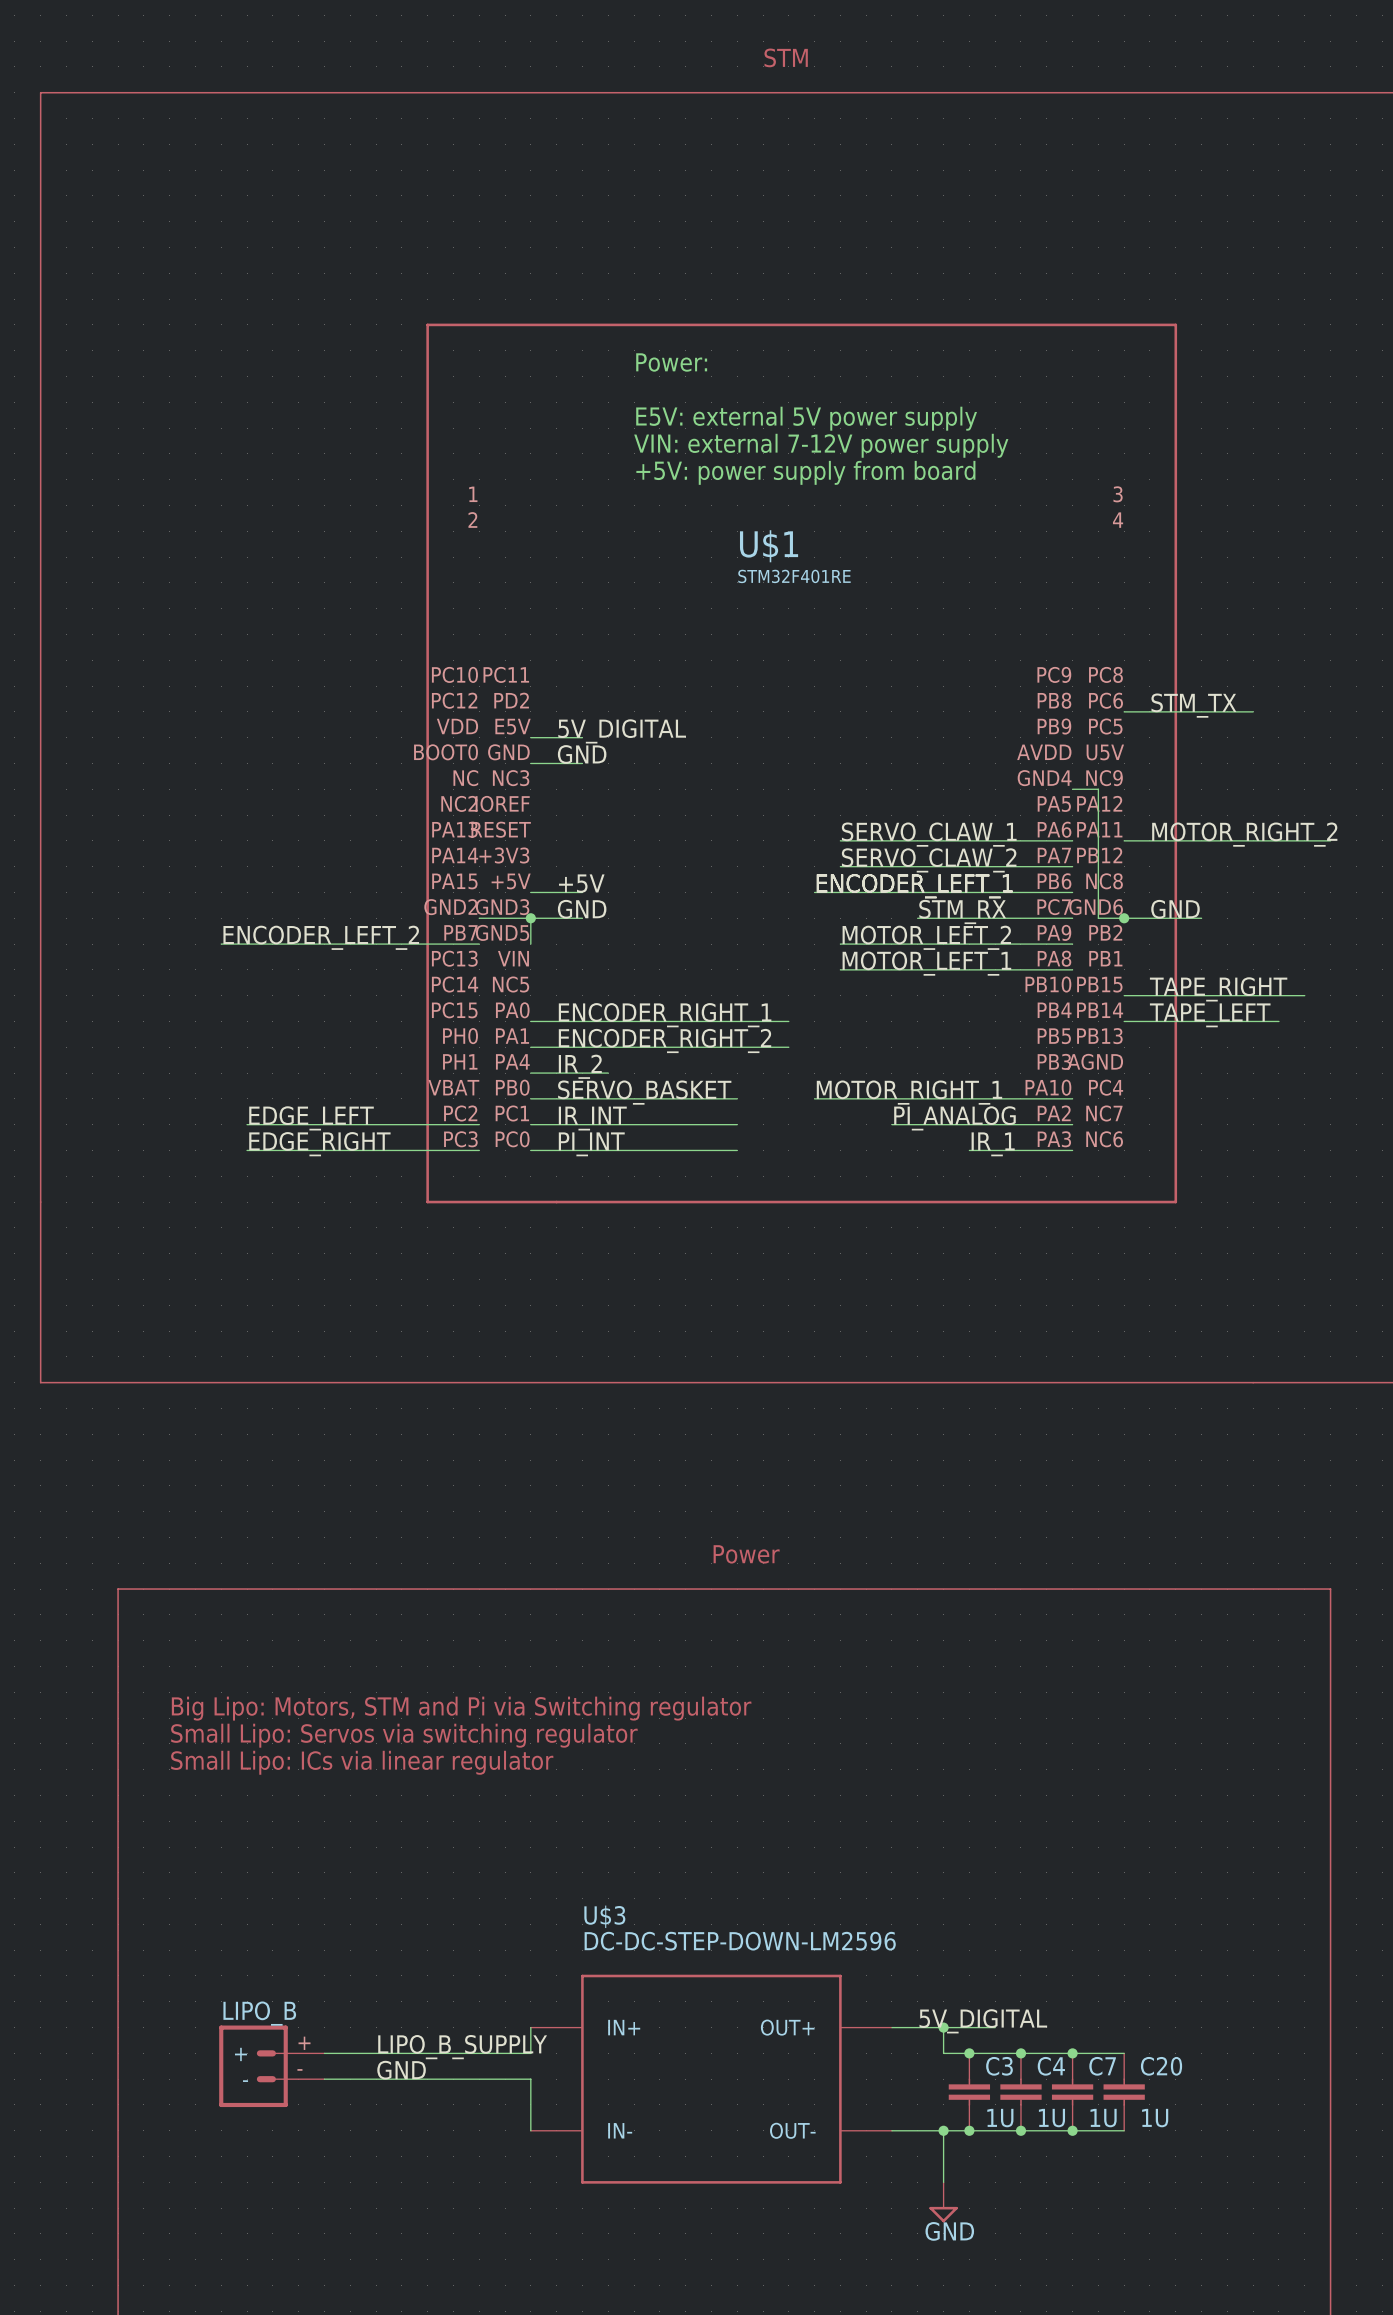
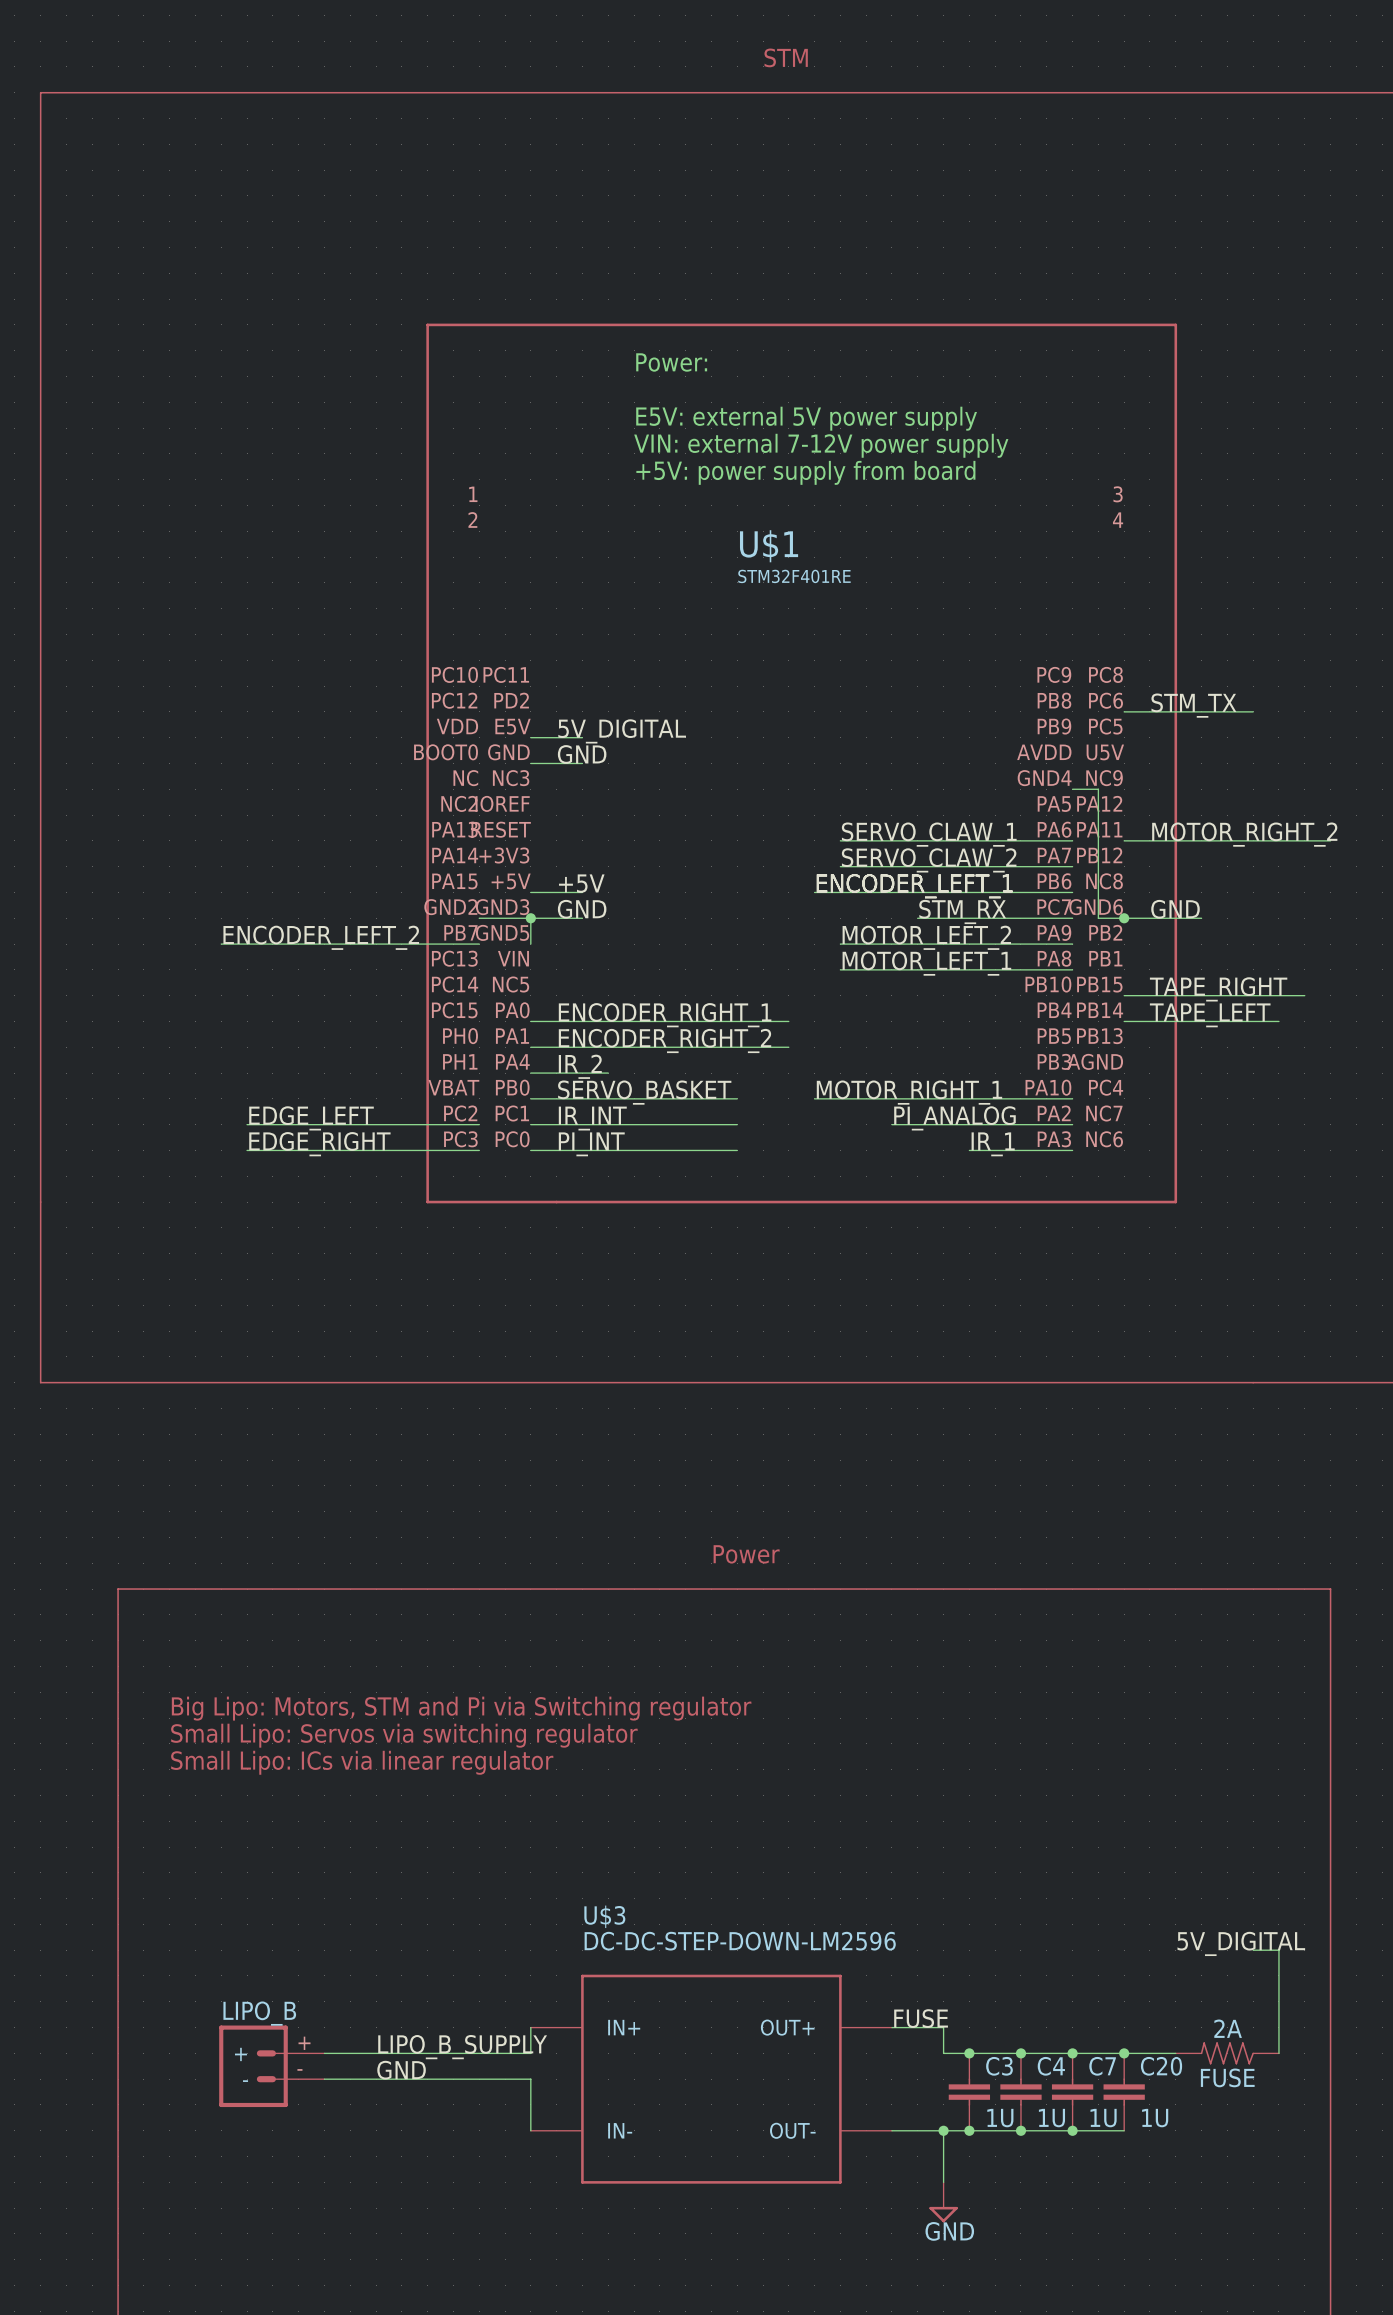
label: none -> 5V_DIGITAL (1241, 1943)
wire: none -> (1253, 1950) (1278, 1950) (1278, 2053)
label: none -> FUSE (921, 2018)
label: 5V_DIGITAL (983, 2021) -> none
wire: (943, 2027) (995, 2027) -> (1124, 2053) (1175, 2053)
junction: (943, 2027) -> none
junction: none -> (1124, 2053)
FUSE: none -> 2A (1227, 2053)

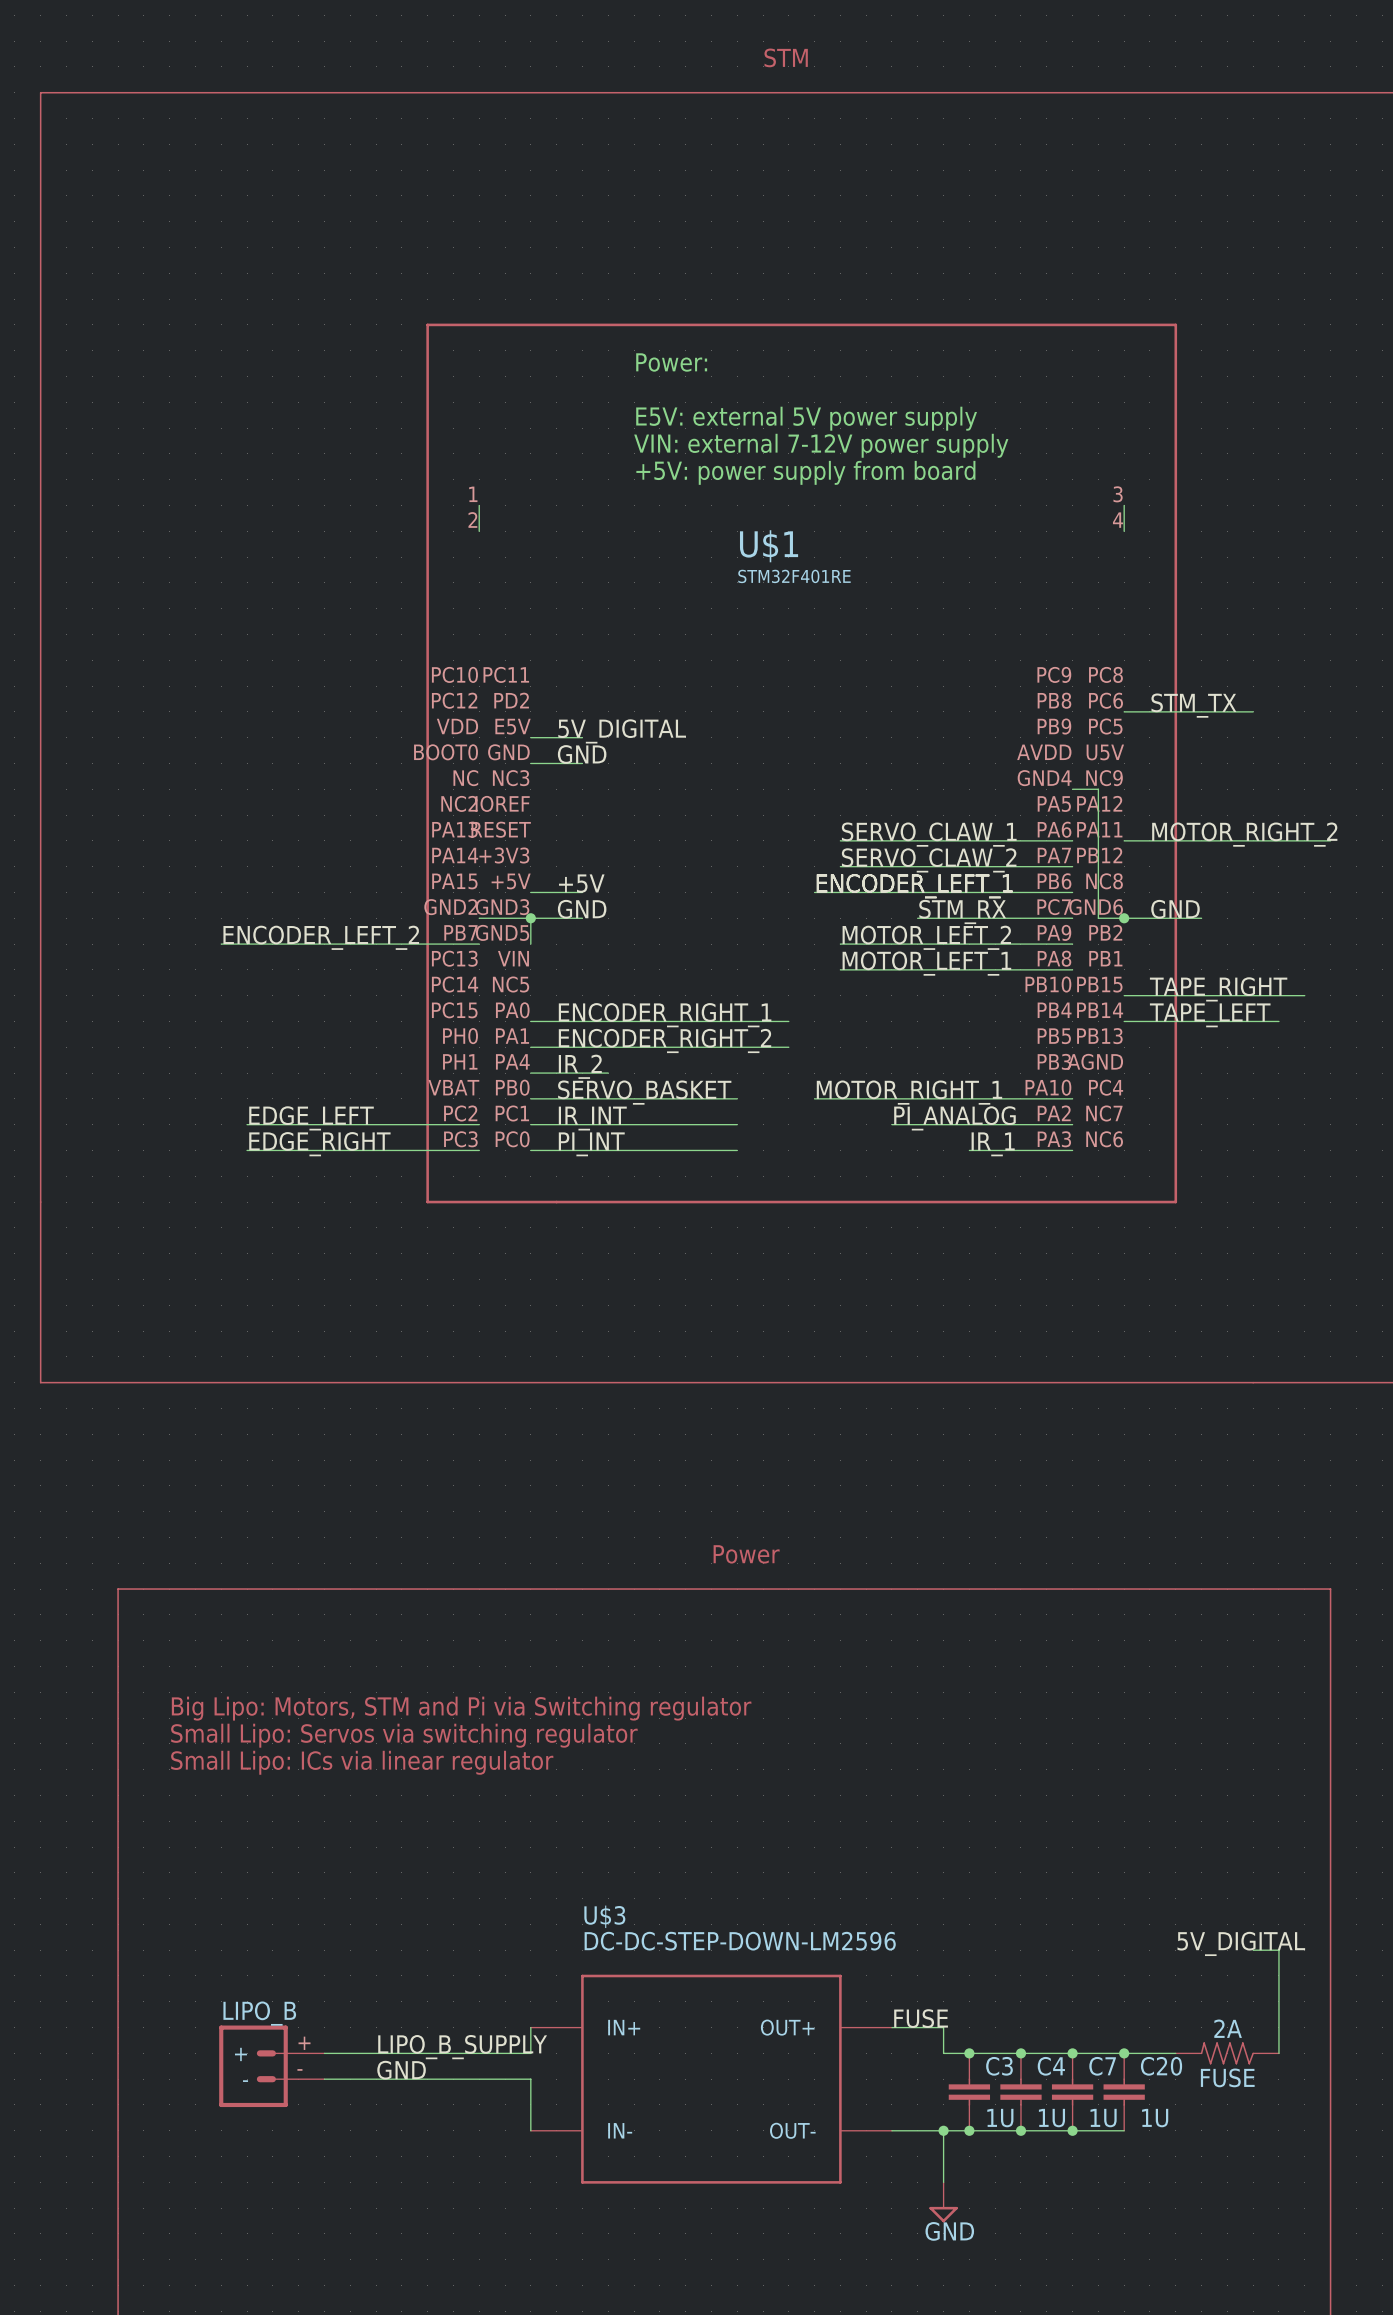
wire: none -> (479, 505) (479, 531)
wire: none -> (1124, 505) (1124, 531)

